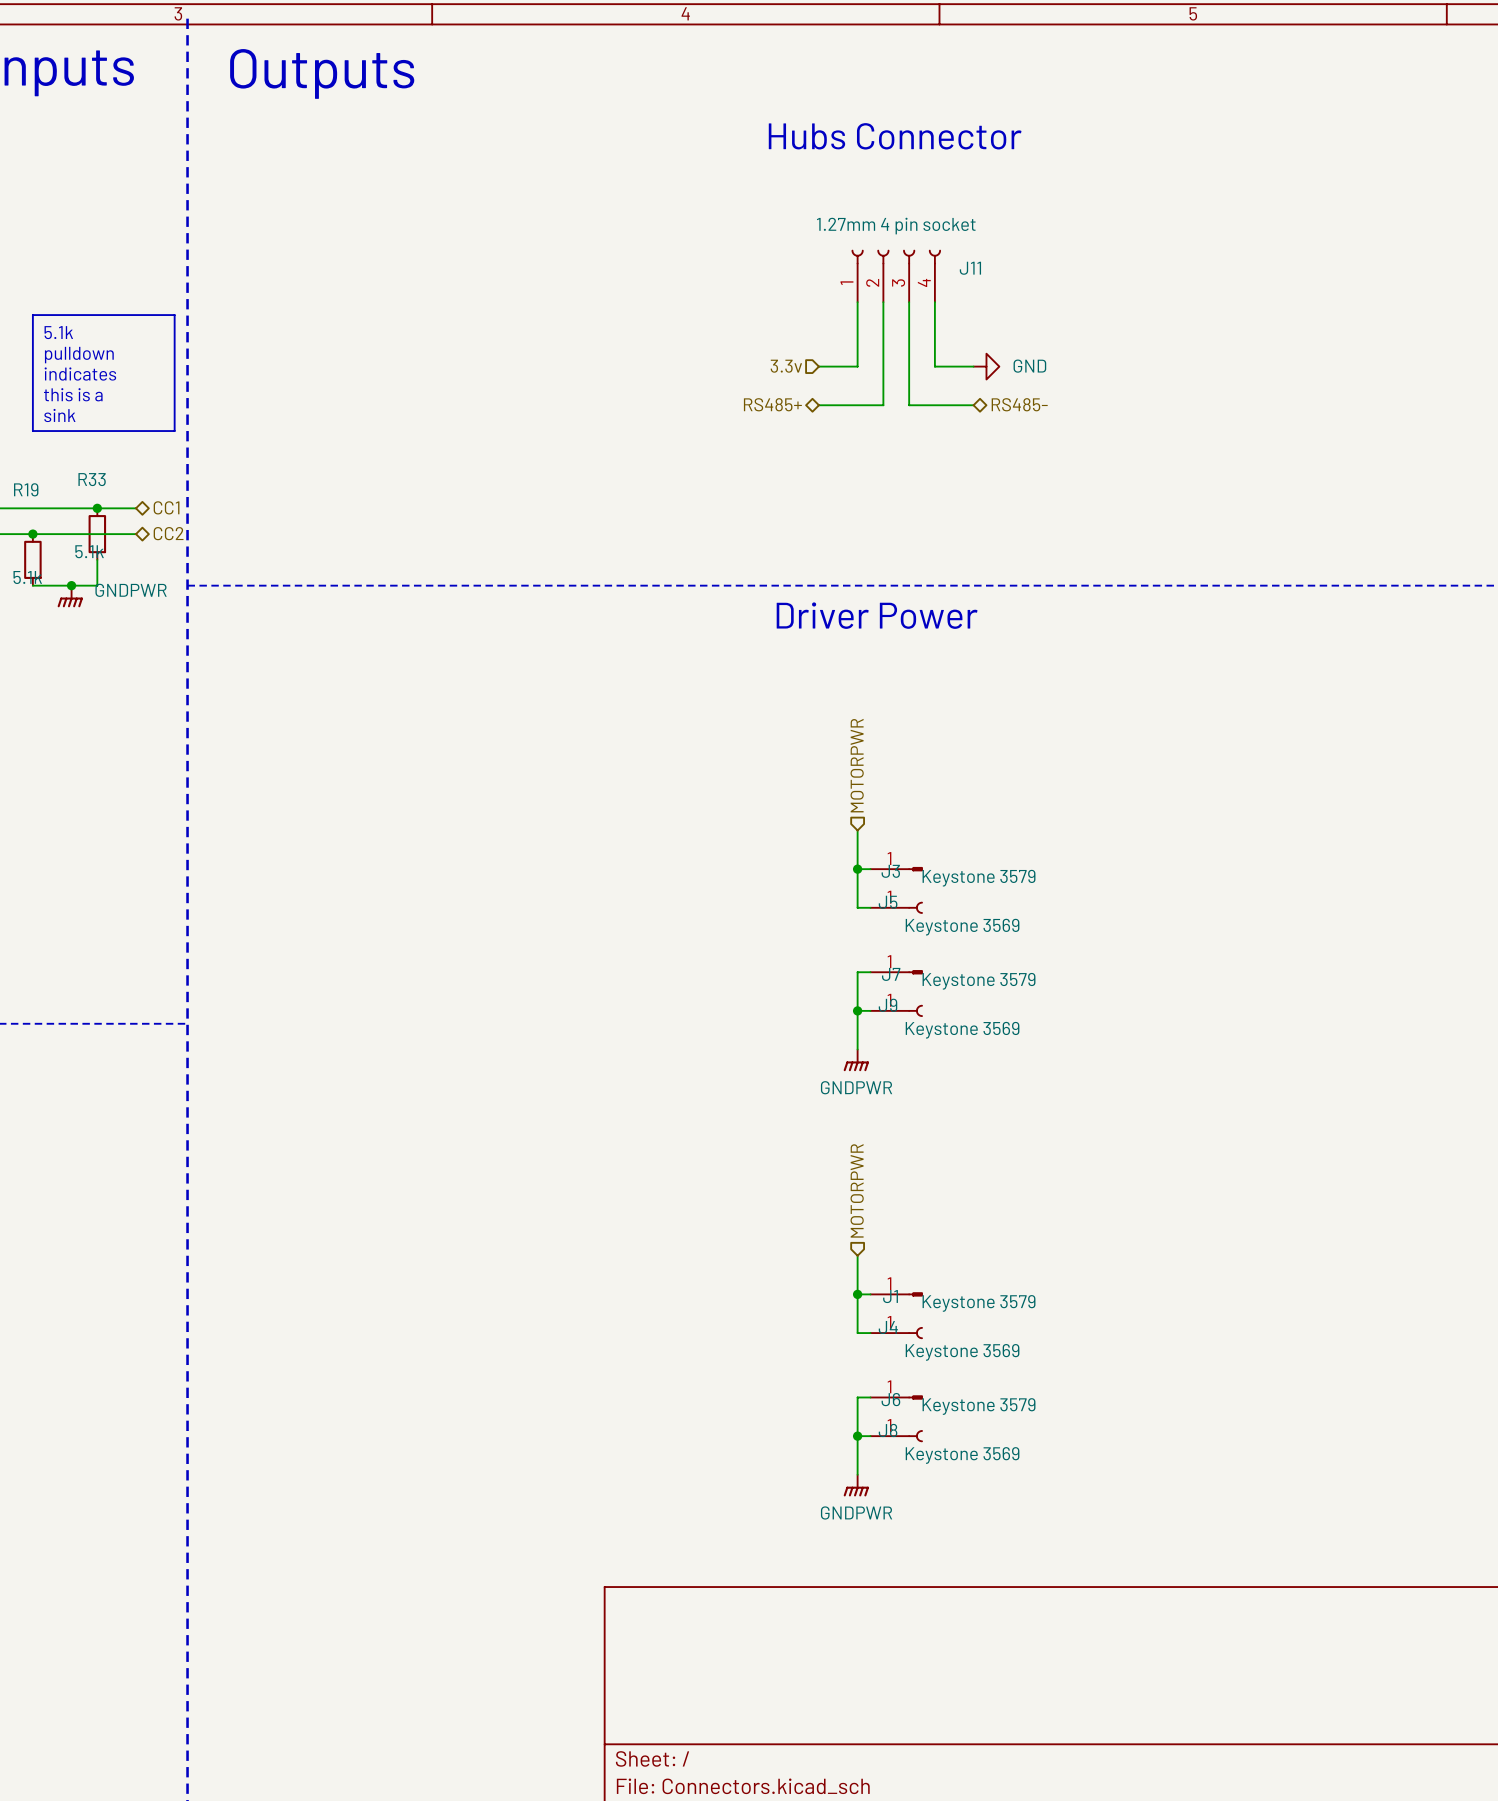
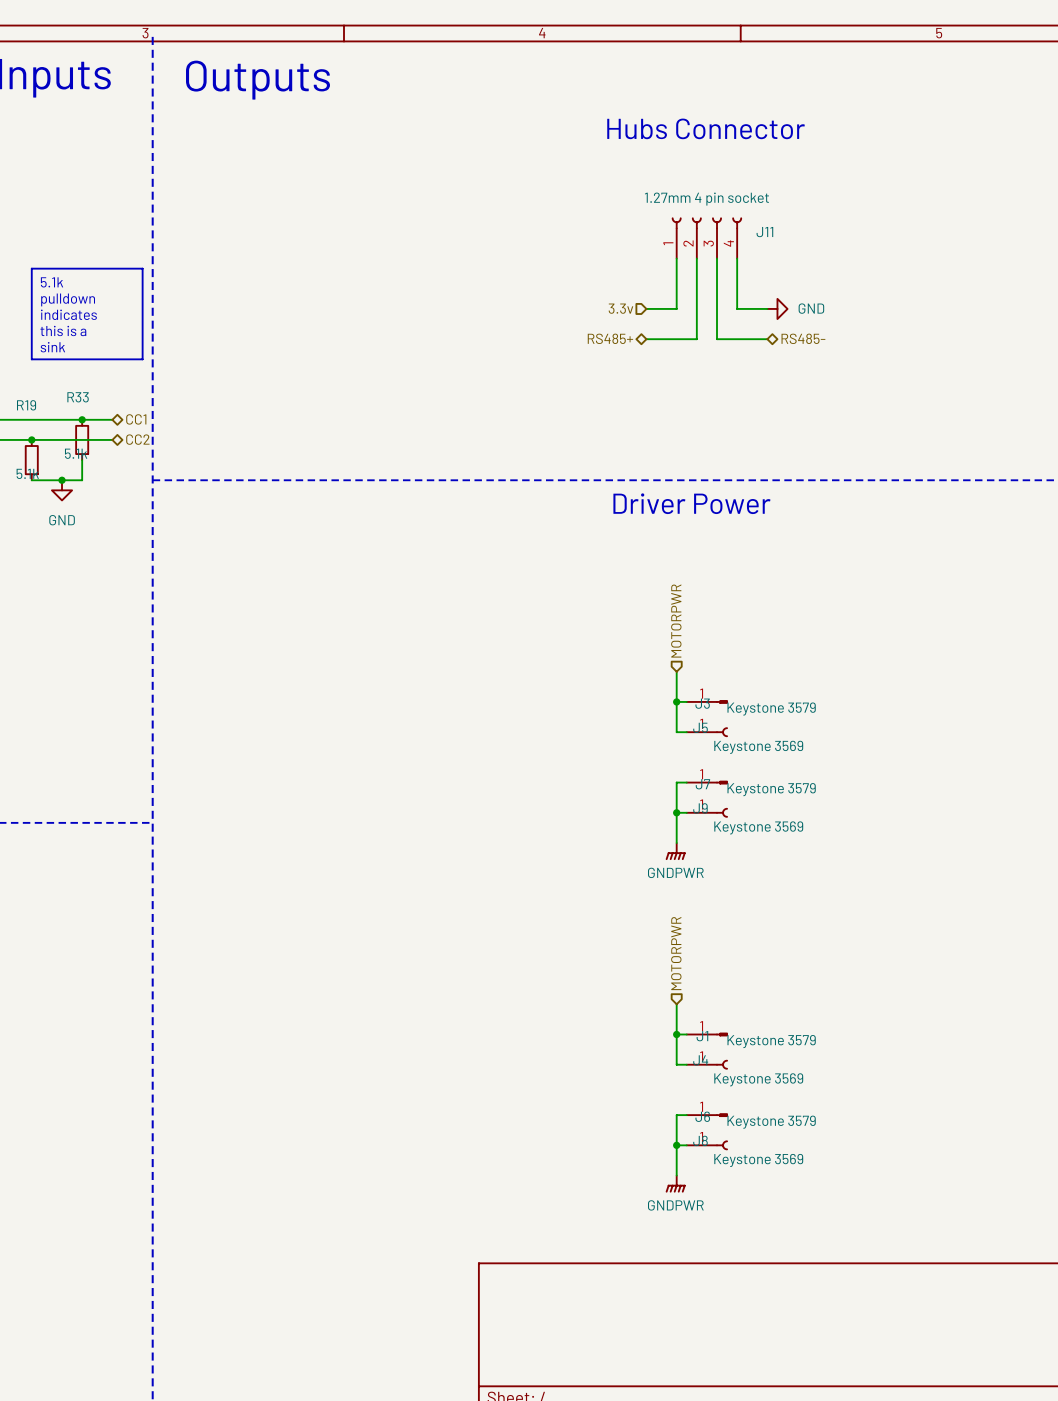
power symbol: GNDPWR (70, 596) -> GND (62, 490)

